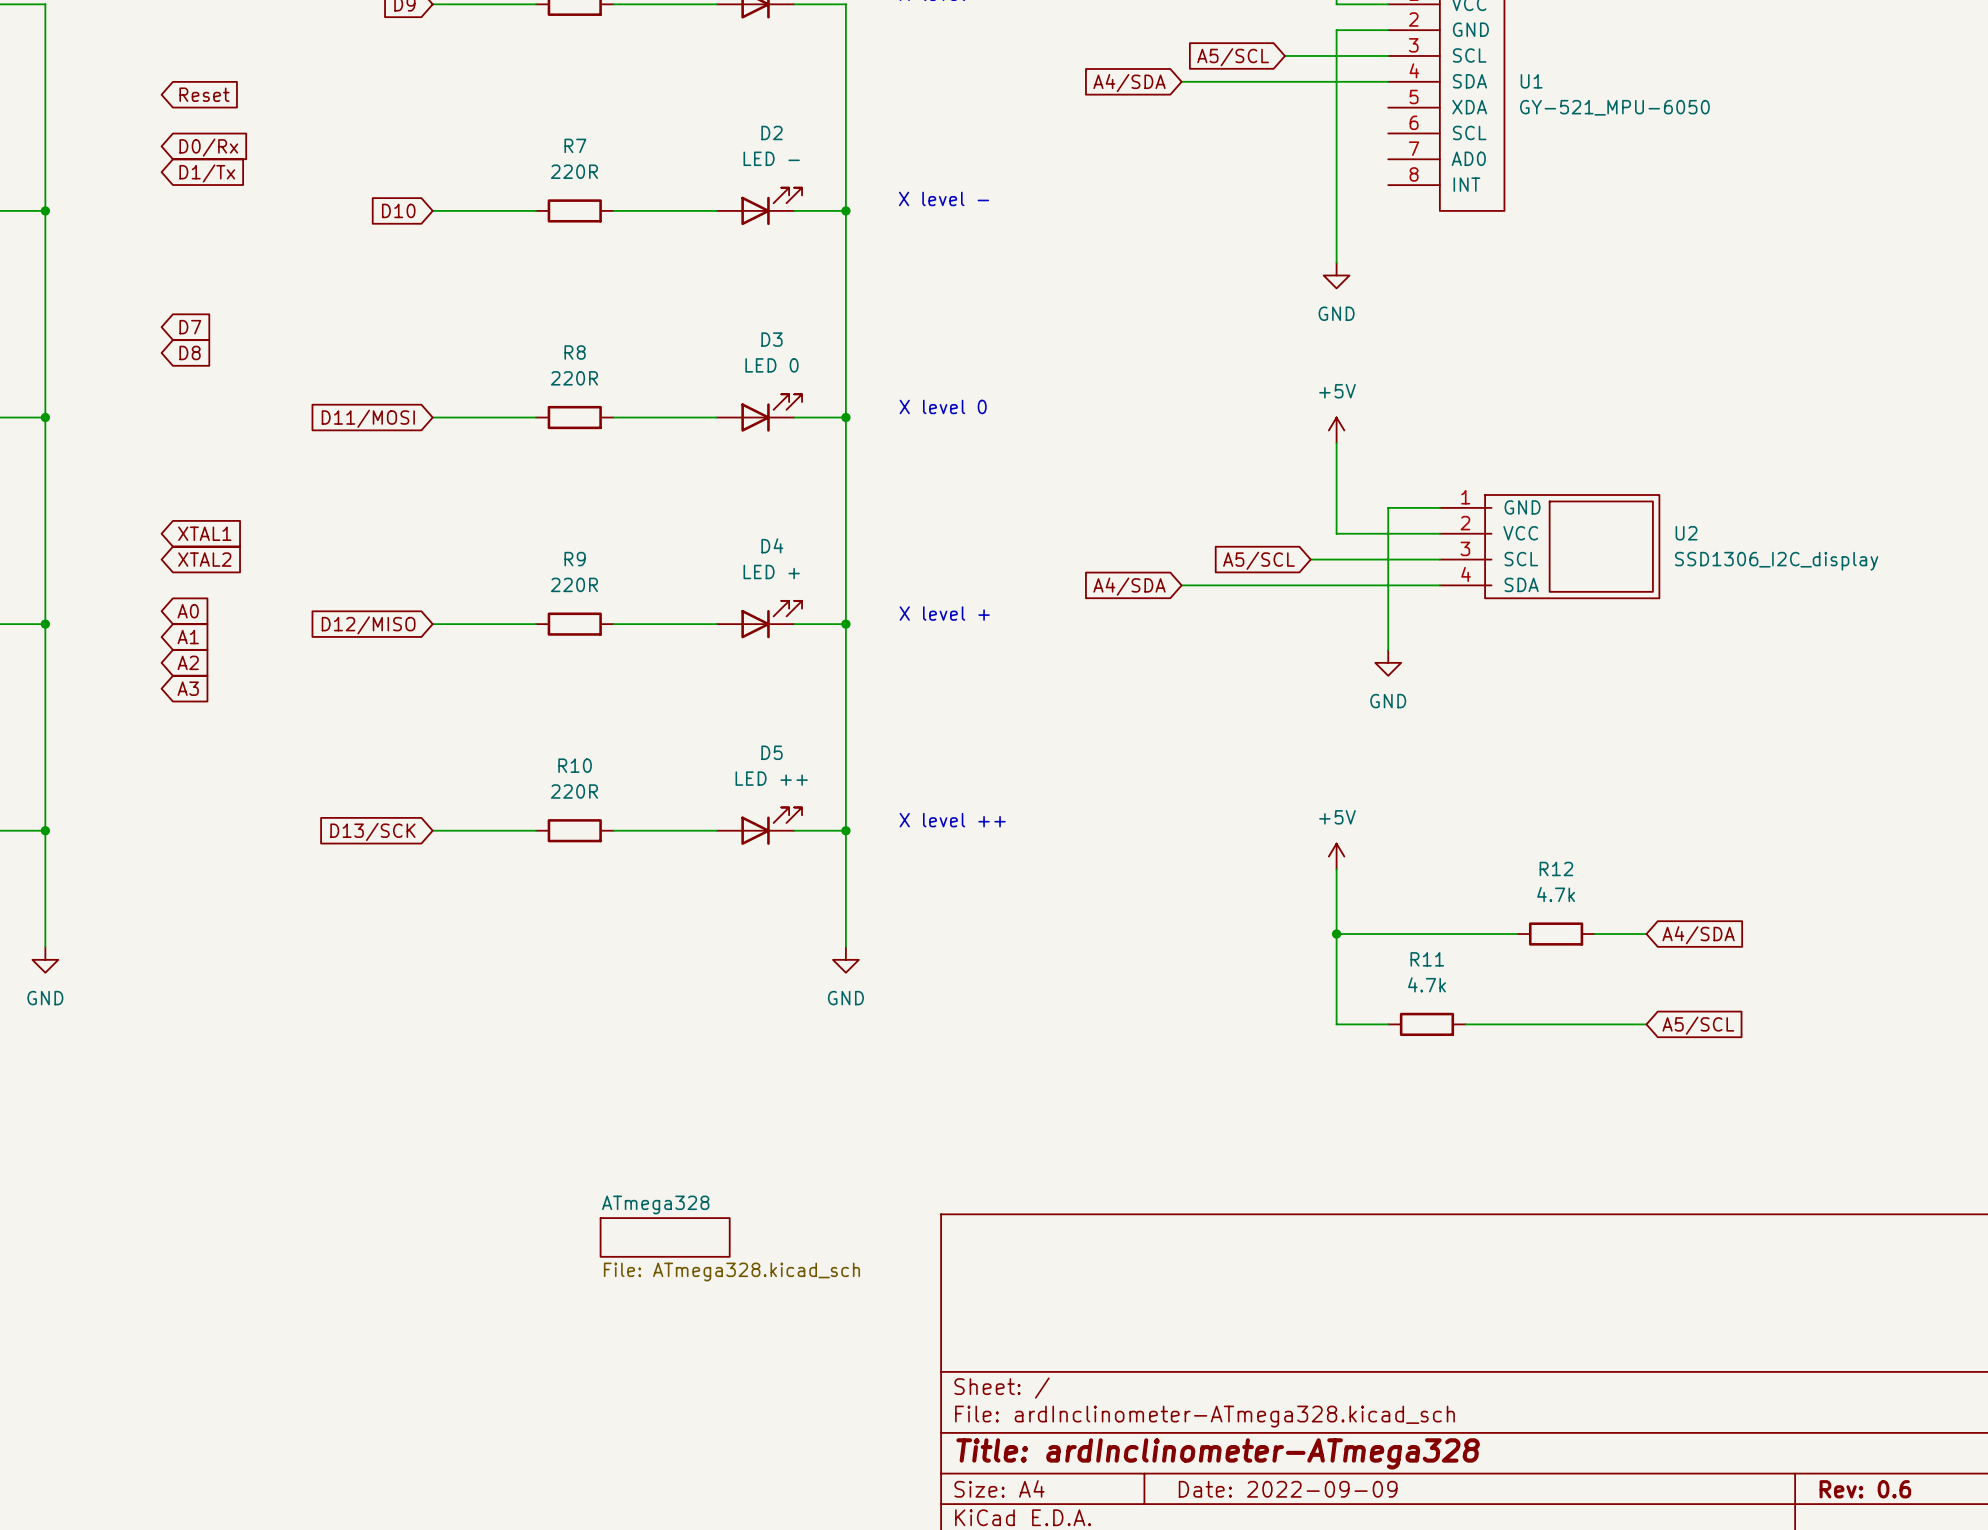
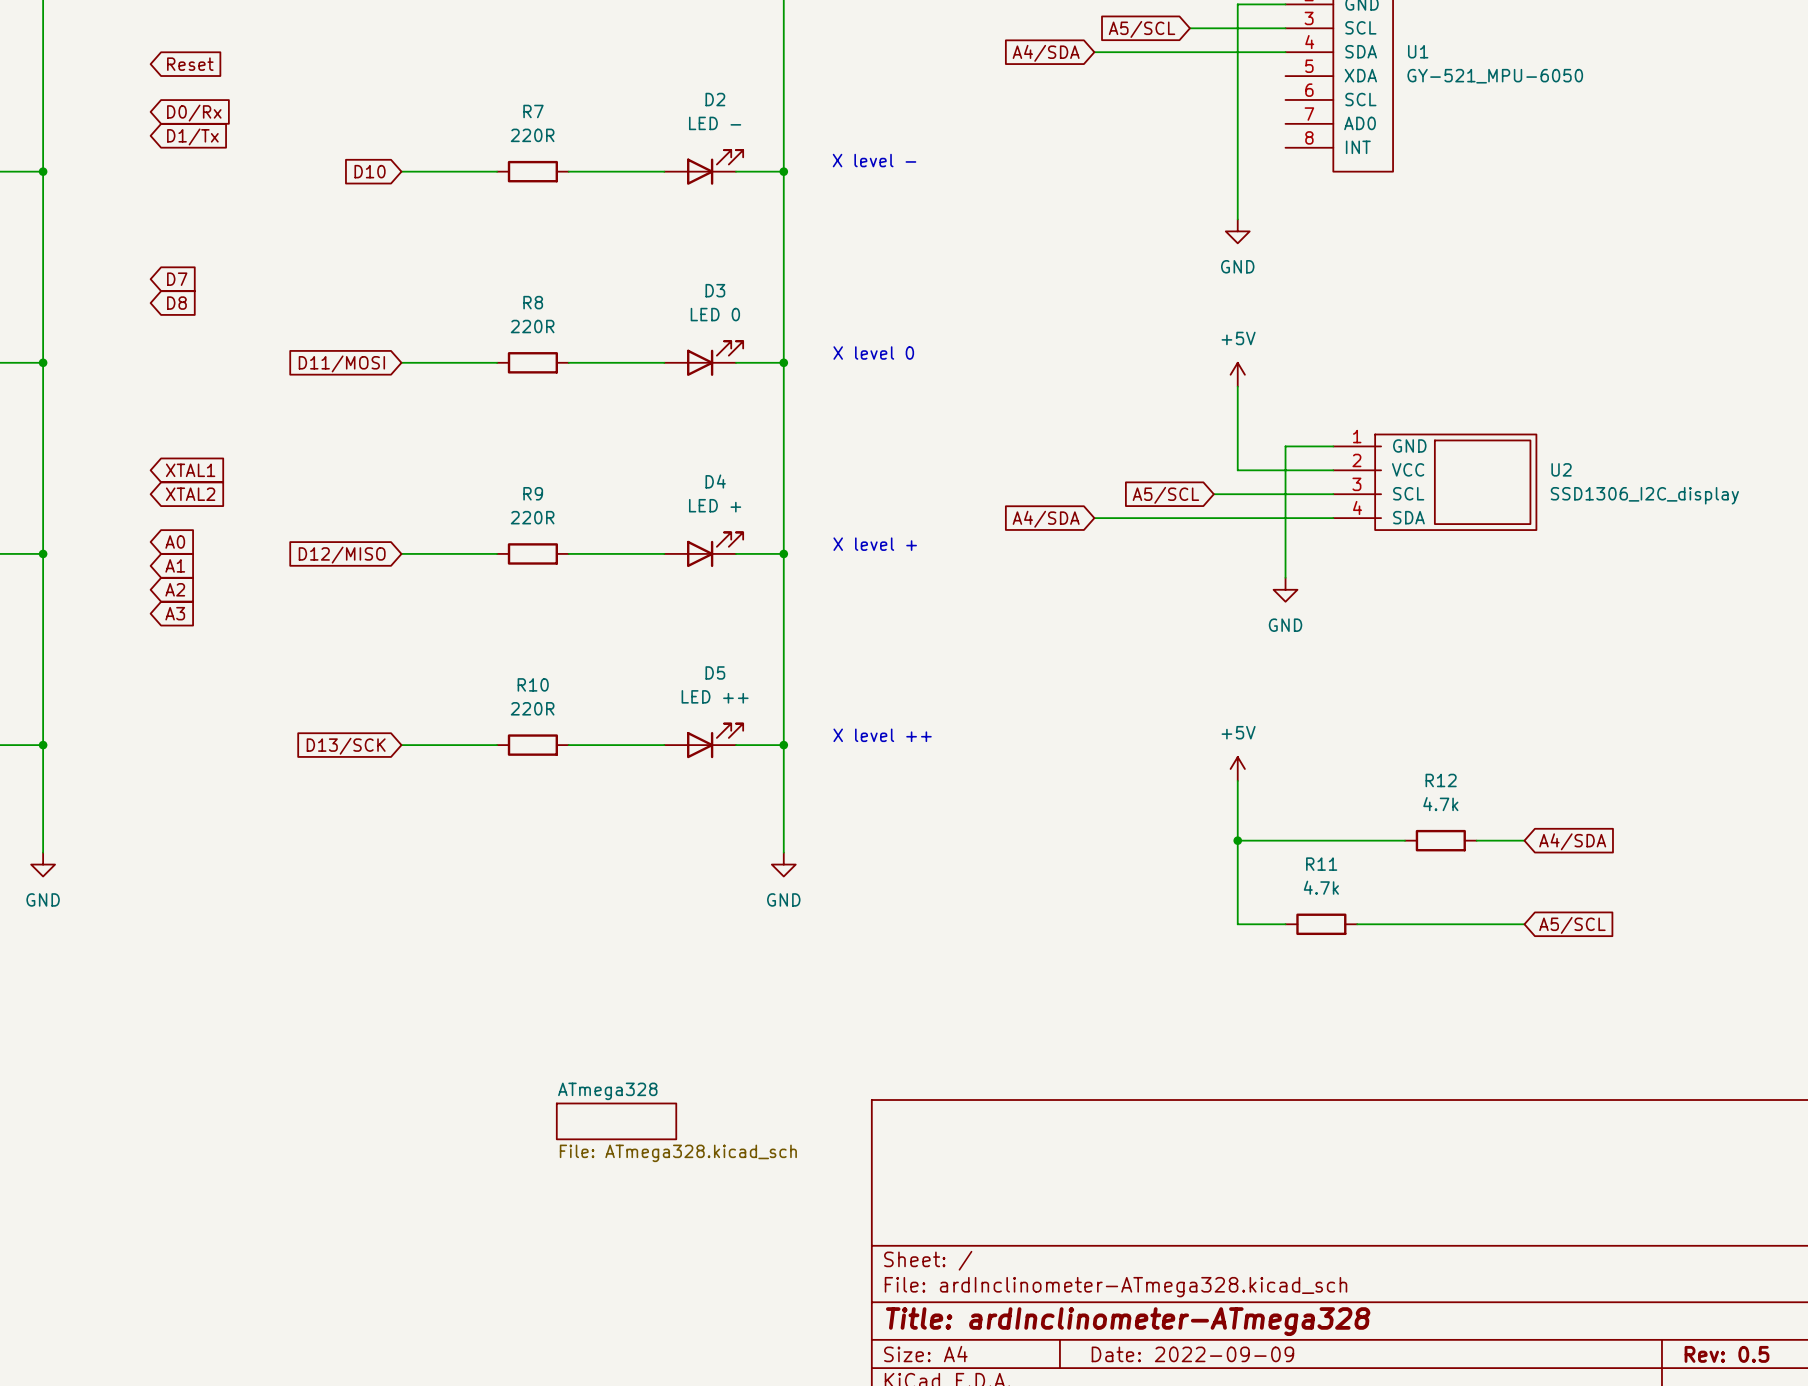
title block: Rev: 0.6 (1865, 1489) -> Rev: 0.5 (1727, 1354)

